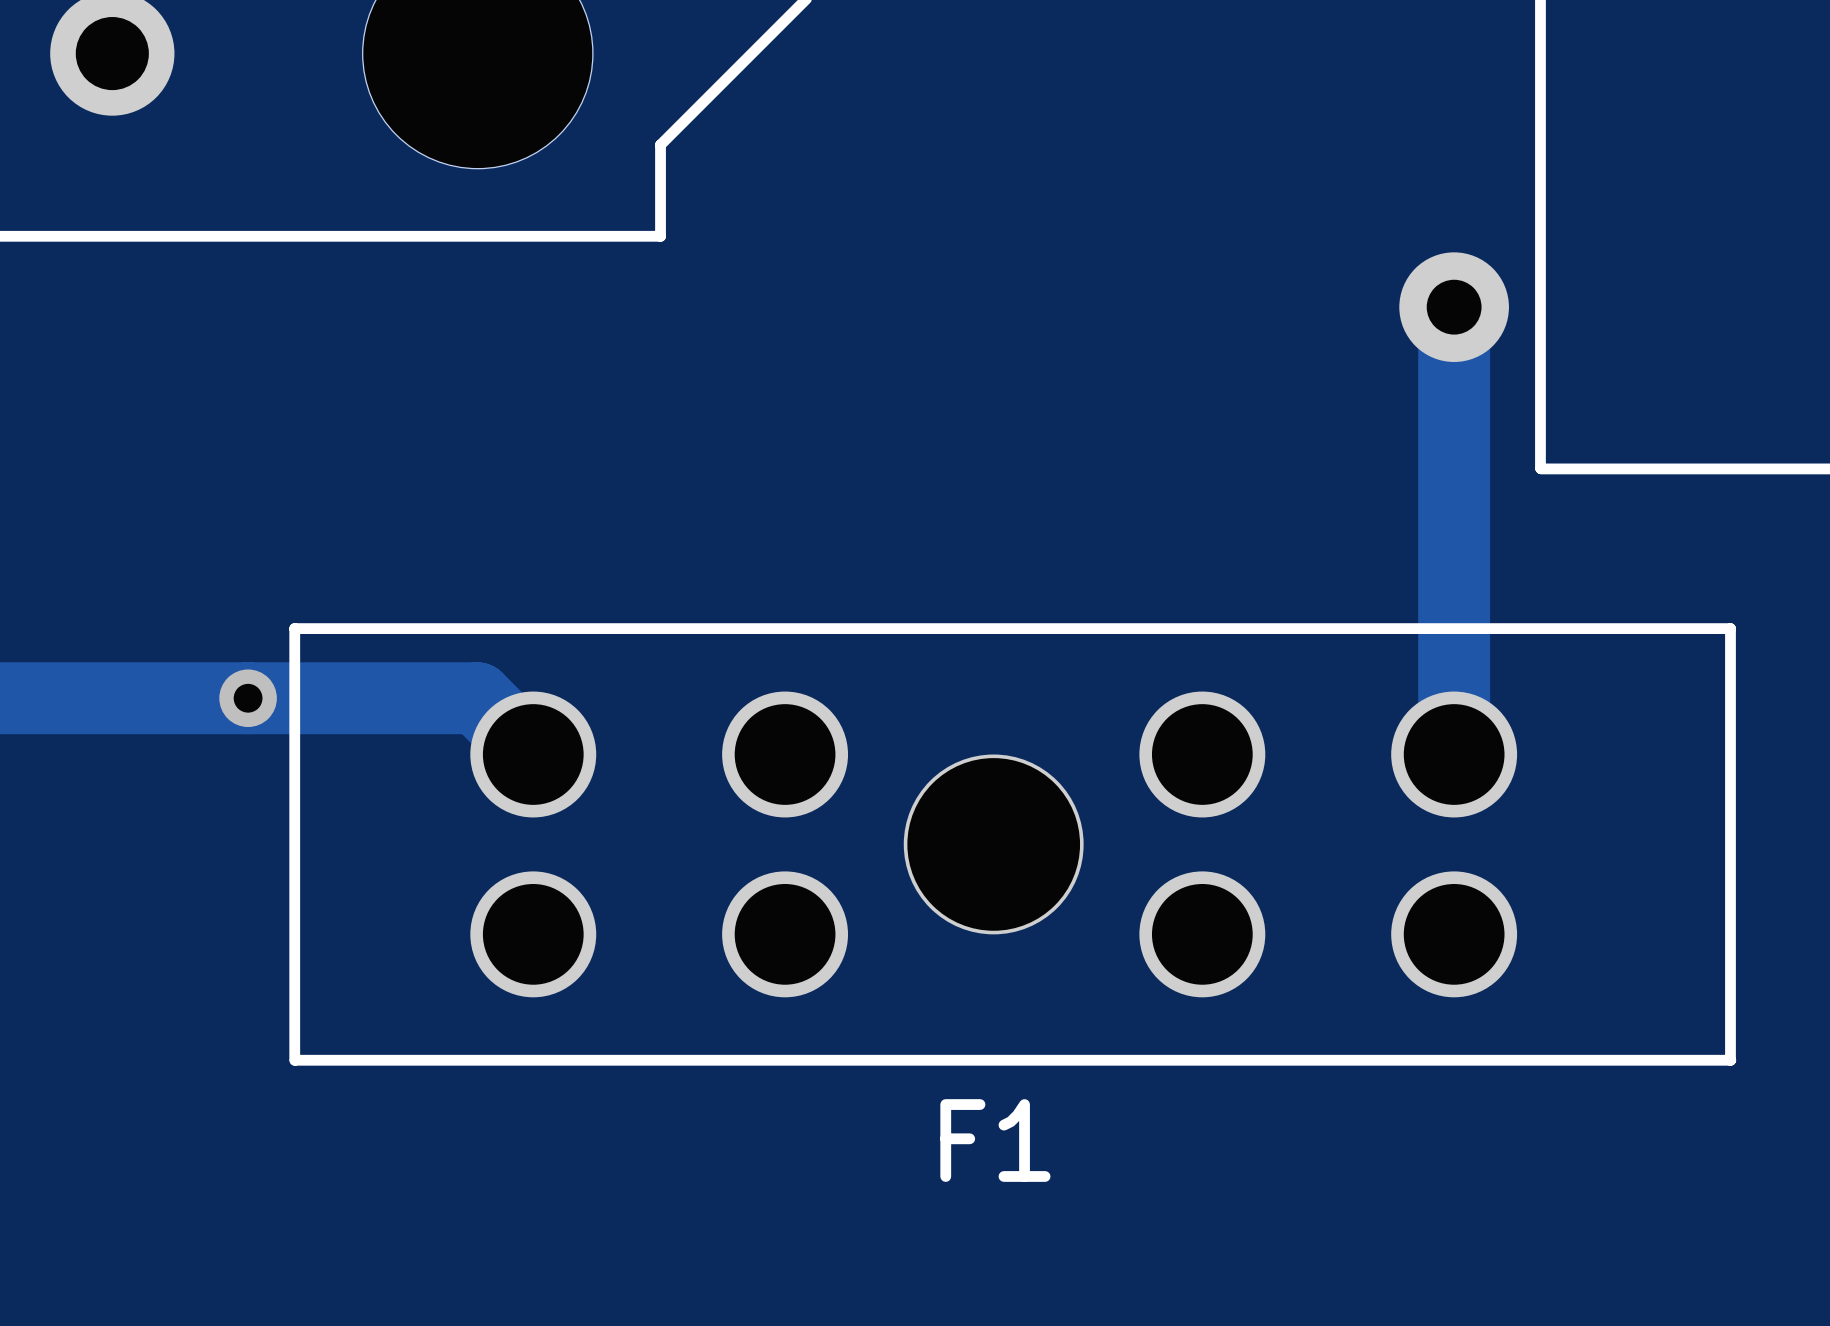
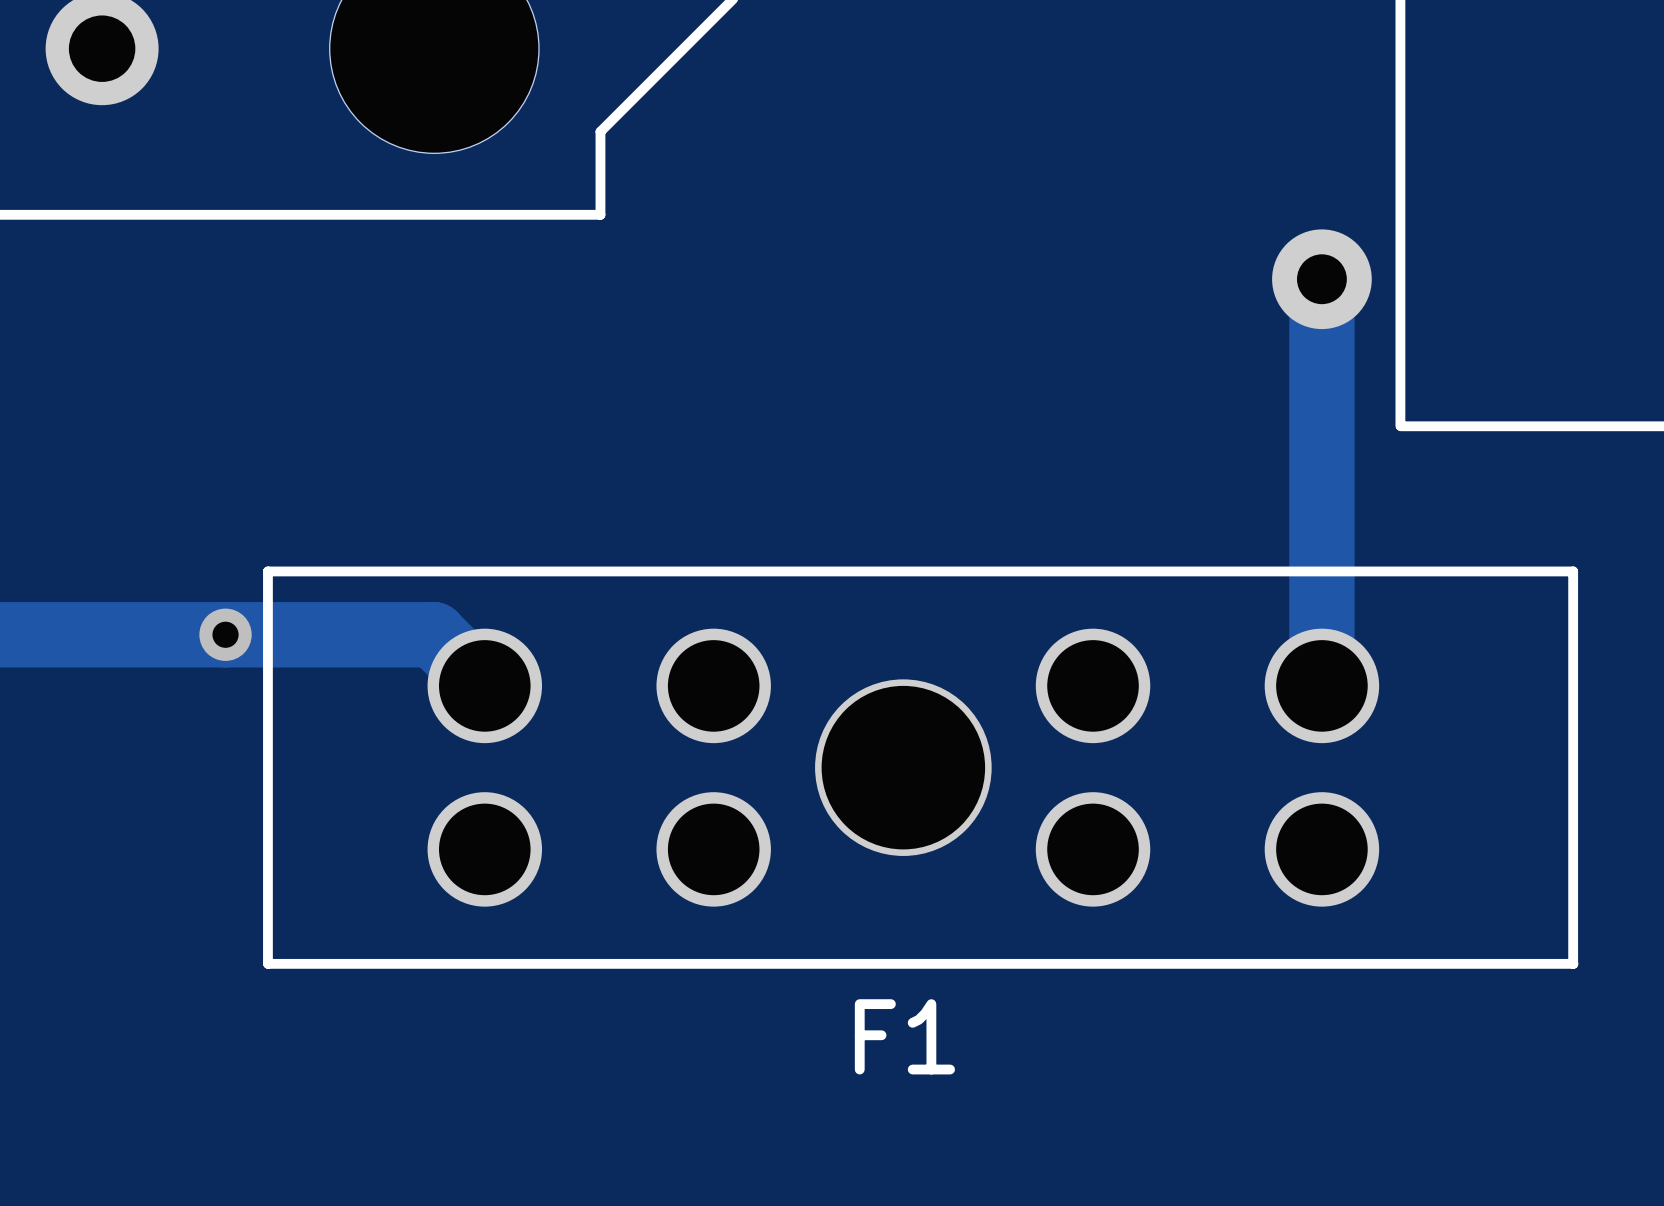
F1 footprint: [289, 623, 1737, 1066] -> [263, 566, 1579, 969]

